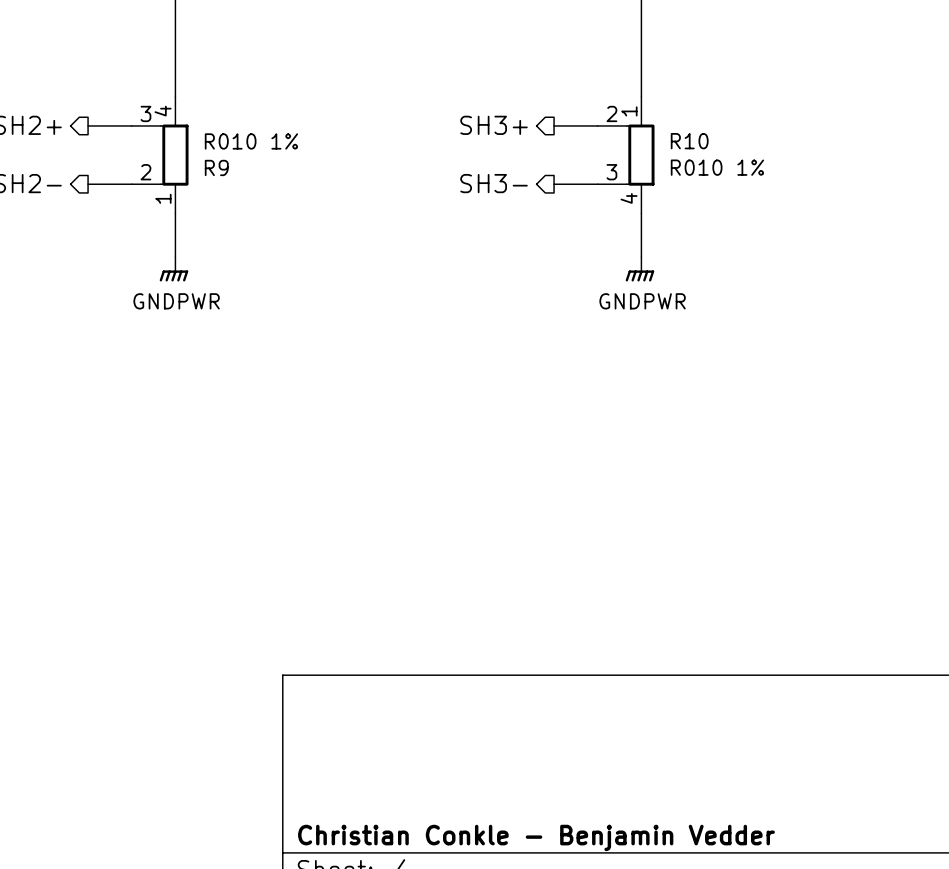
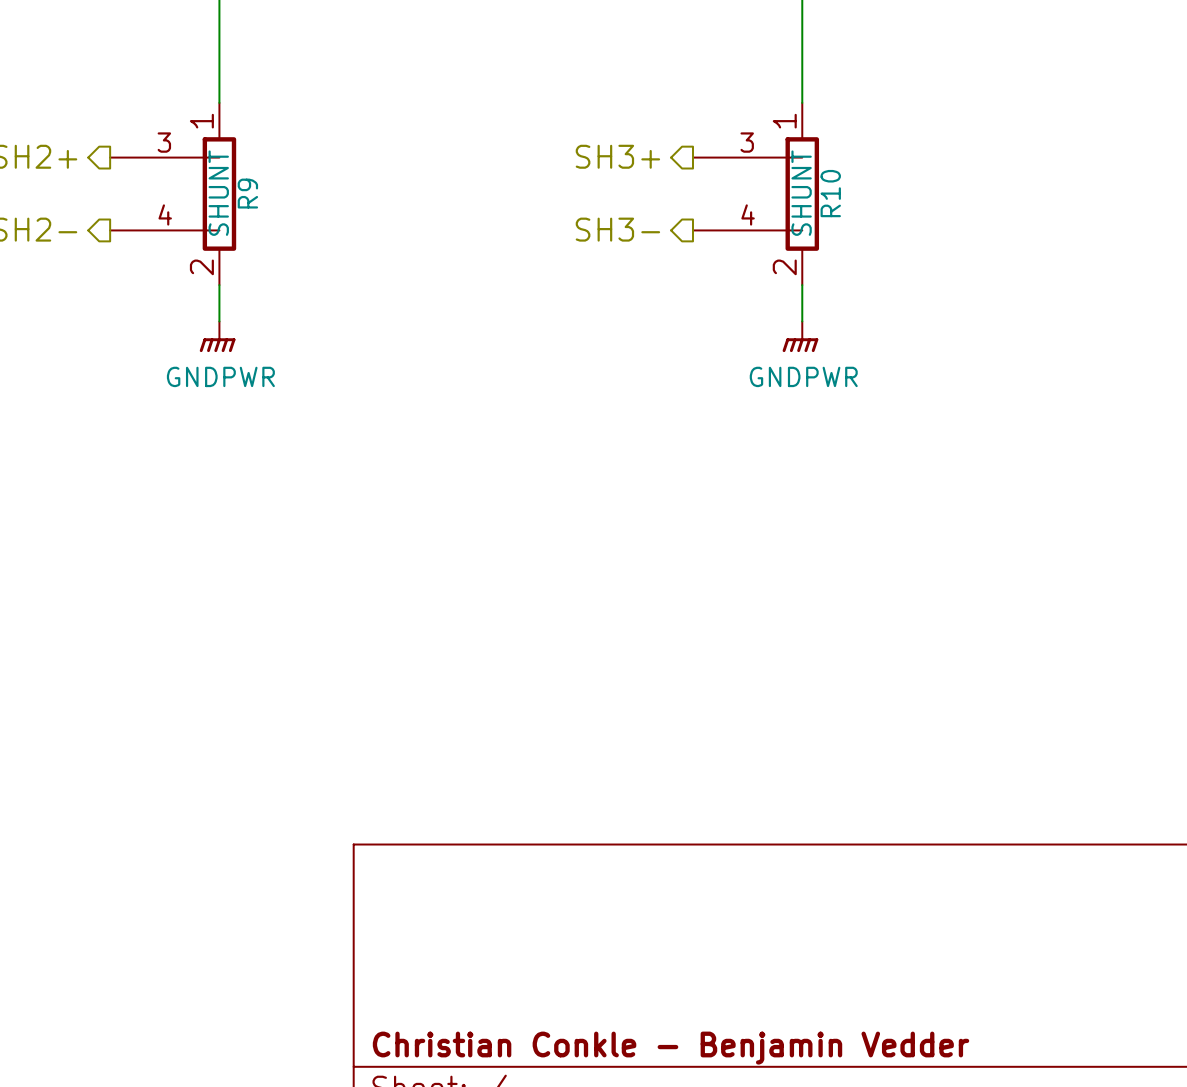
R9 symbol: [131, 96, 189, 214] -> [110, 102, 237, 286]
R10 symbol: [597, 96, 655, 214] -> [692, 102, 820, 286]
R9 value: R010 1% (251, 141) -> SHUNT (218, 193)
R10 value: R010 1% (717, 167) -> SHUNT (801, 193)

